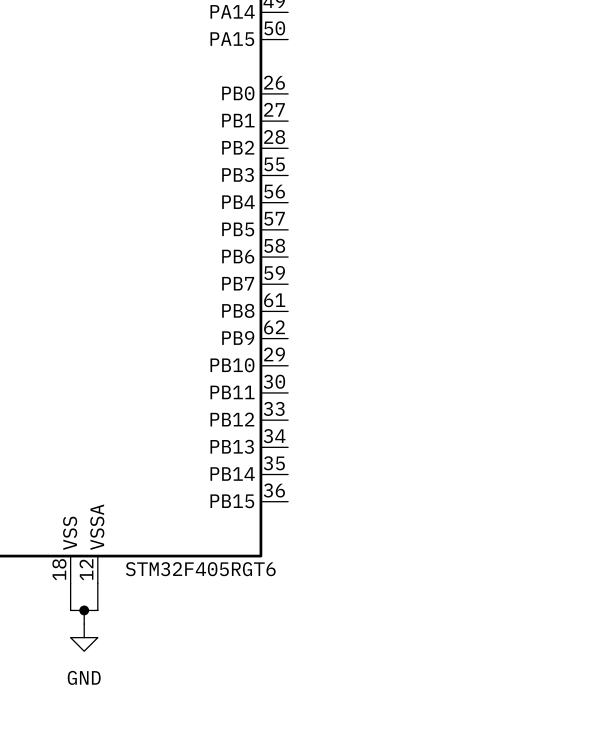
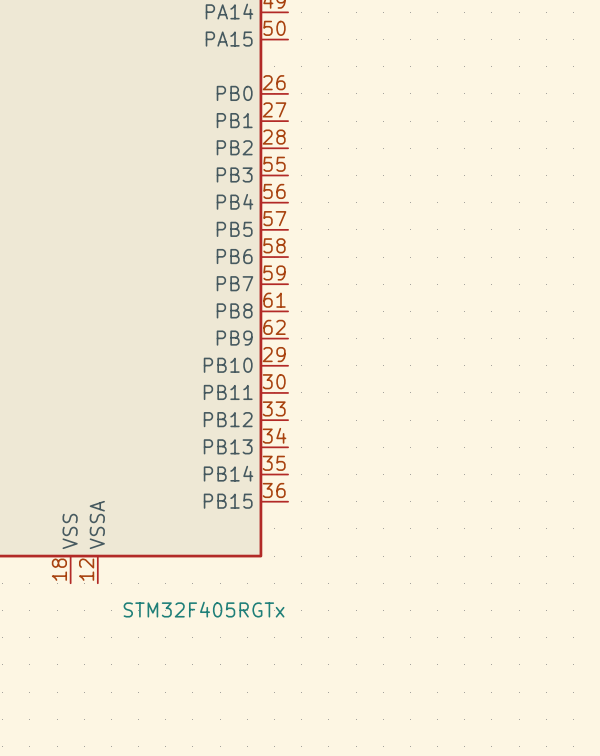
part value: STM32F405RGT6 (200, 569) -> STM32F405RGTx (204, 609)
wire: (70, 583) (70, 610) (97, 610) (97, 583) -> none
wire: (84, 610) (84, 624) -> none
junction: (84, 610) -> none
power symbol: GND (84, 637) -> none

